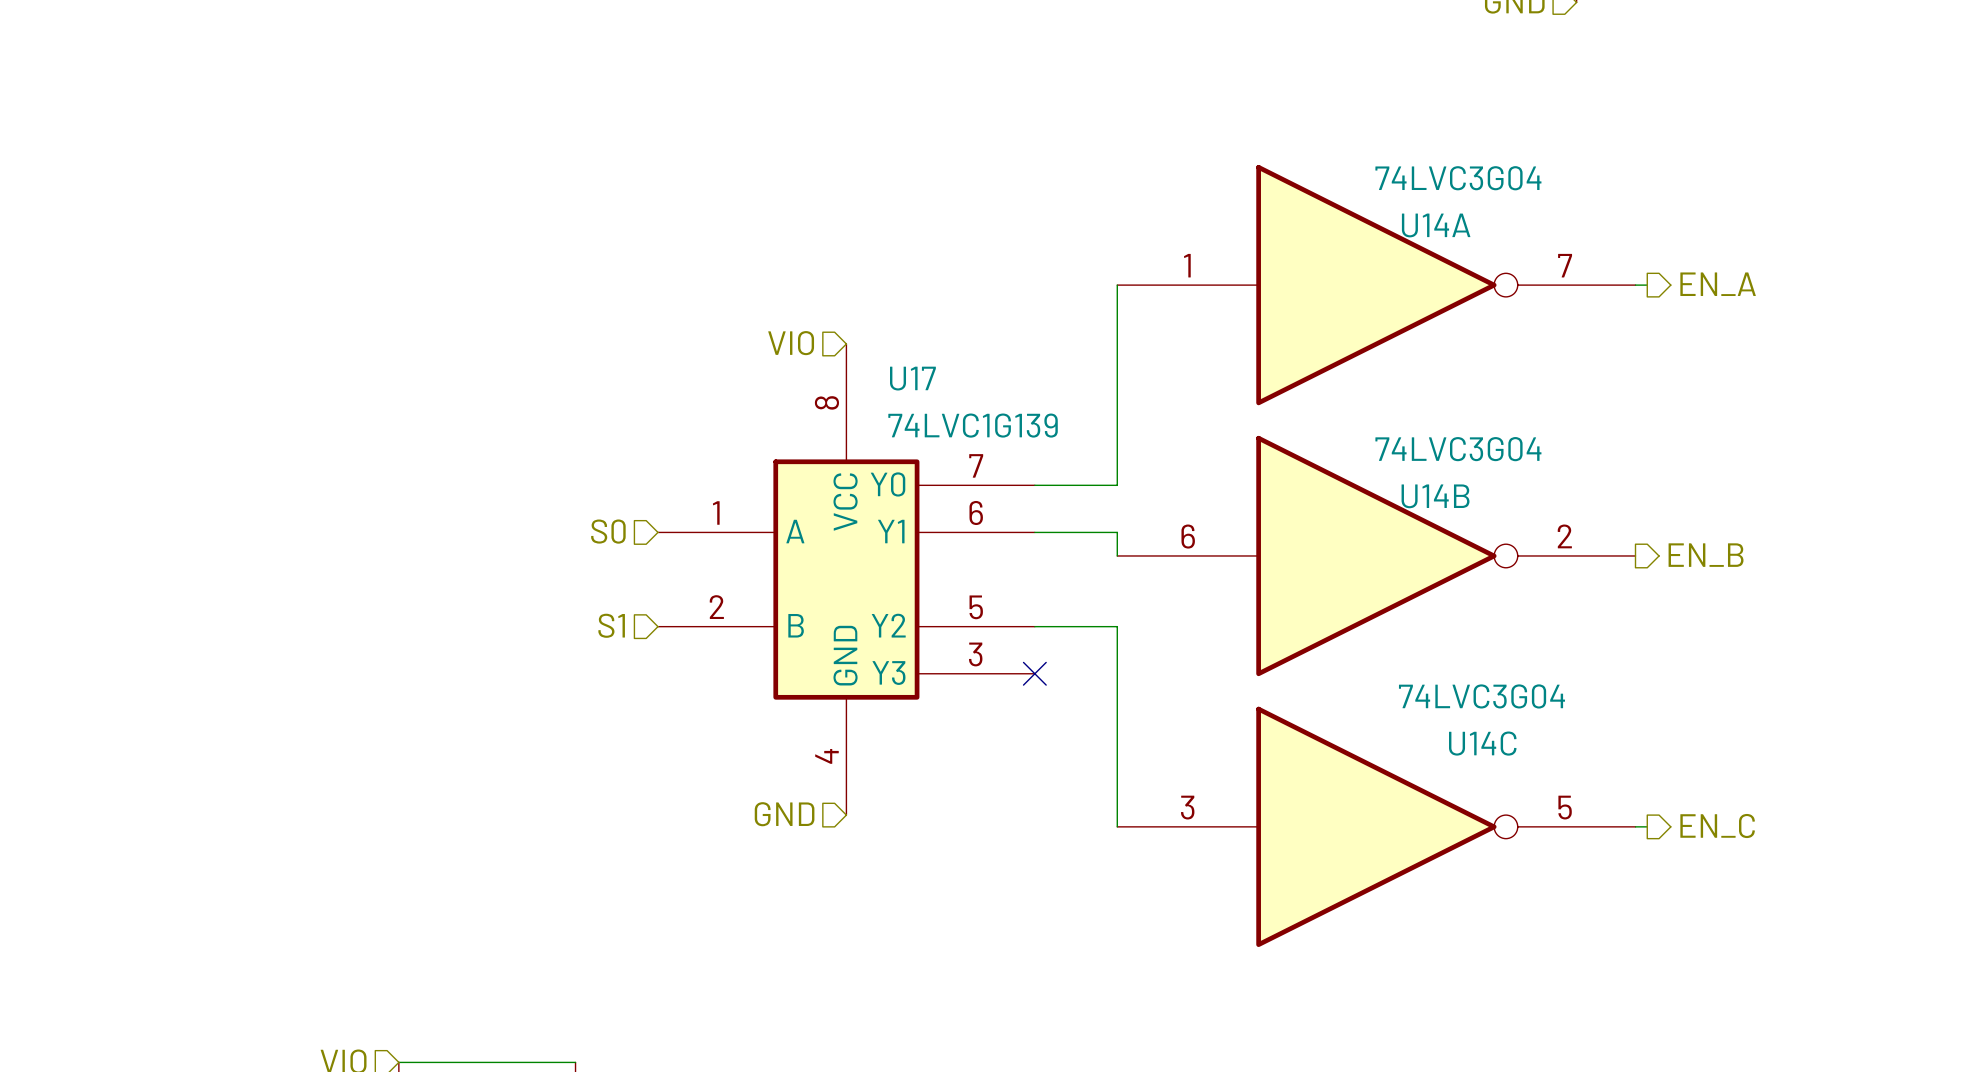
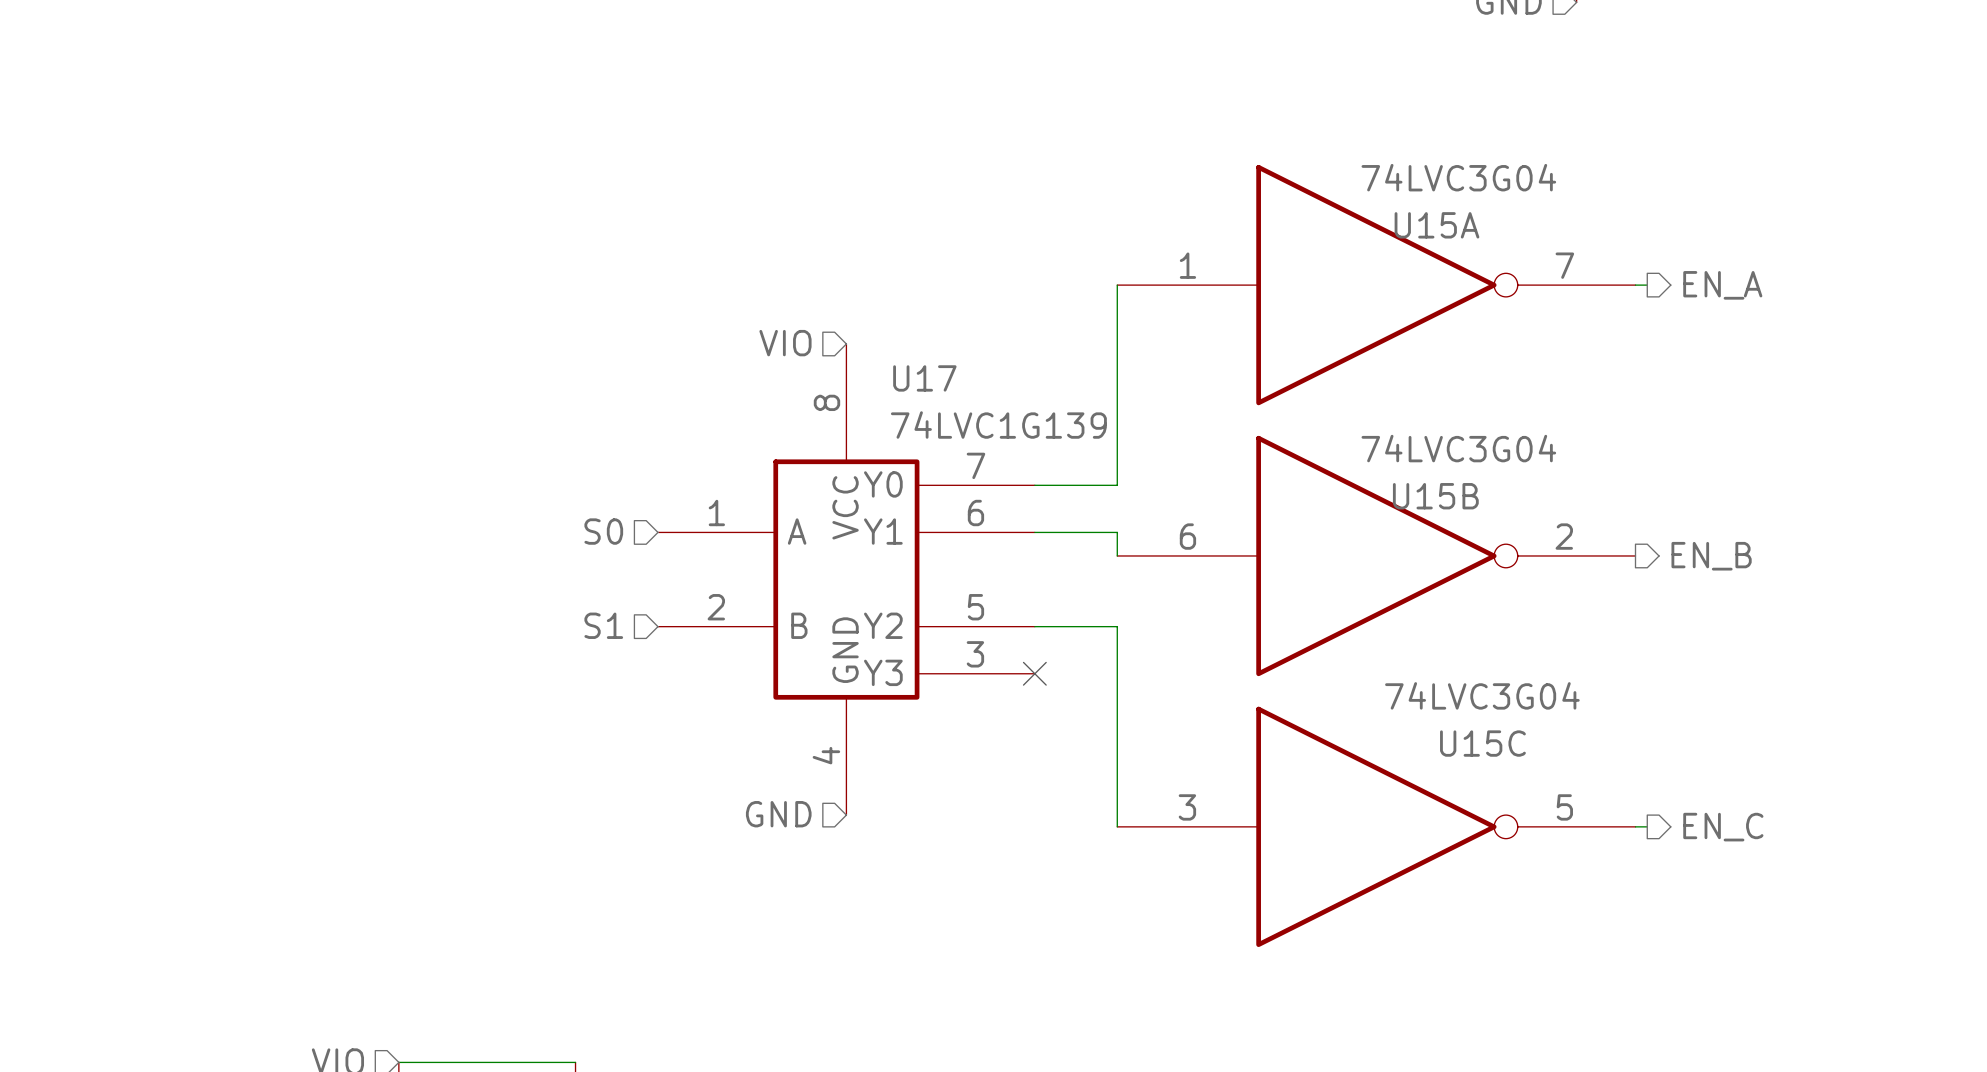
U14A name: U14A (1436, 225) -> U15A (1436, 225)
U14B name: U14B (1435, 496) -> U15B (1435, 496)
U14C name: U14C (1482, 743) -> U15C (1482, 743)

